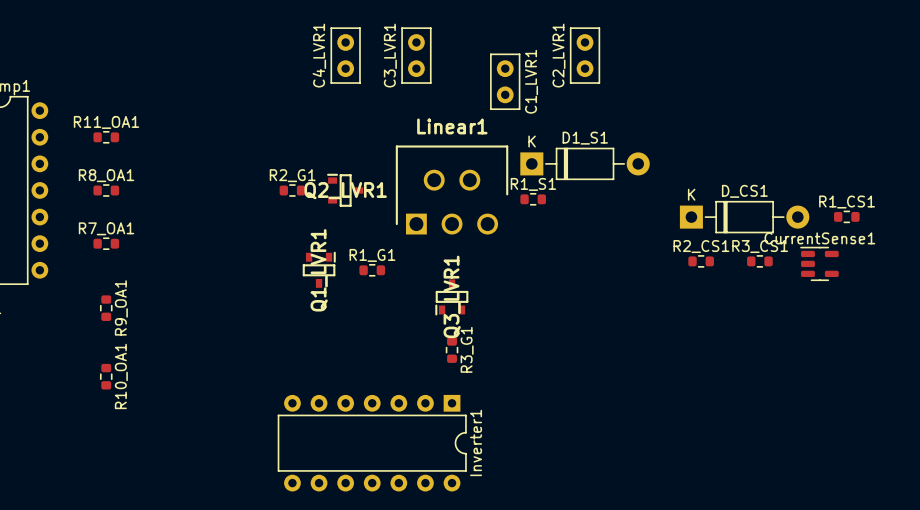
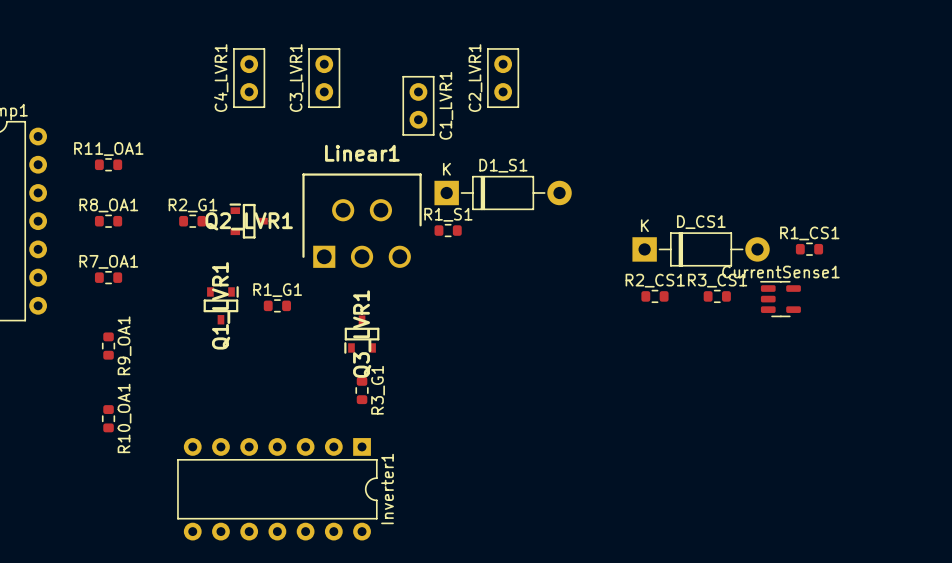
C4_LVR1 position: (345, 55) -> (249, 78)
C3_LVR1 position: (416, 55) -> (324, 78)
C2_LVR1 position: (585, 55) -> (503, 78)
C1_LVR1 position: (505, 81) -> (418, 105)
D1_S1 position: (585, 163) -> (503, 193)
Linear1 position: (452, 189) -> (362, 220)
R2_G1 position: (292, 190) -> (192, 221)
Q2_LVR1 position: (345, 190) -> (248, 220)
R1_S1 position: (533, 199) -> (448, 230)
R1_CS1 position: (846, 216) -> (809, 249)
D_CS1 position: (744, 217) -> (701, 249)
R2_CS1 position: (701, 261) -> (654, 296)
R3_CS1 position: (759, 261) -> (717, 296)
CurrentSense1 position: (819, 263) -> (780, 299)
Q1_LVR1 position: (319, 269) -> (221, 305)
R1_G1 position: (372, 270) -> (277, 305)
Q3_LVR1 position: (451, 297) -> (361, 334)
R3_G1 position: (452, 350) -> (362, 390)
Inverter1 position: (372, 443) -> (277, 489)

